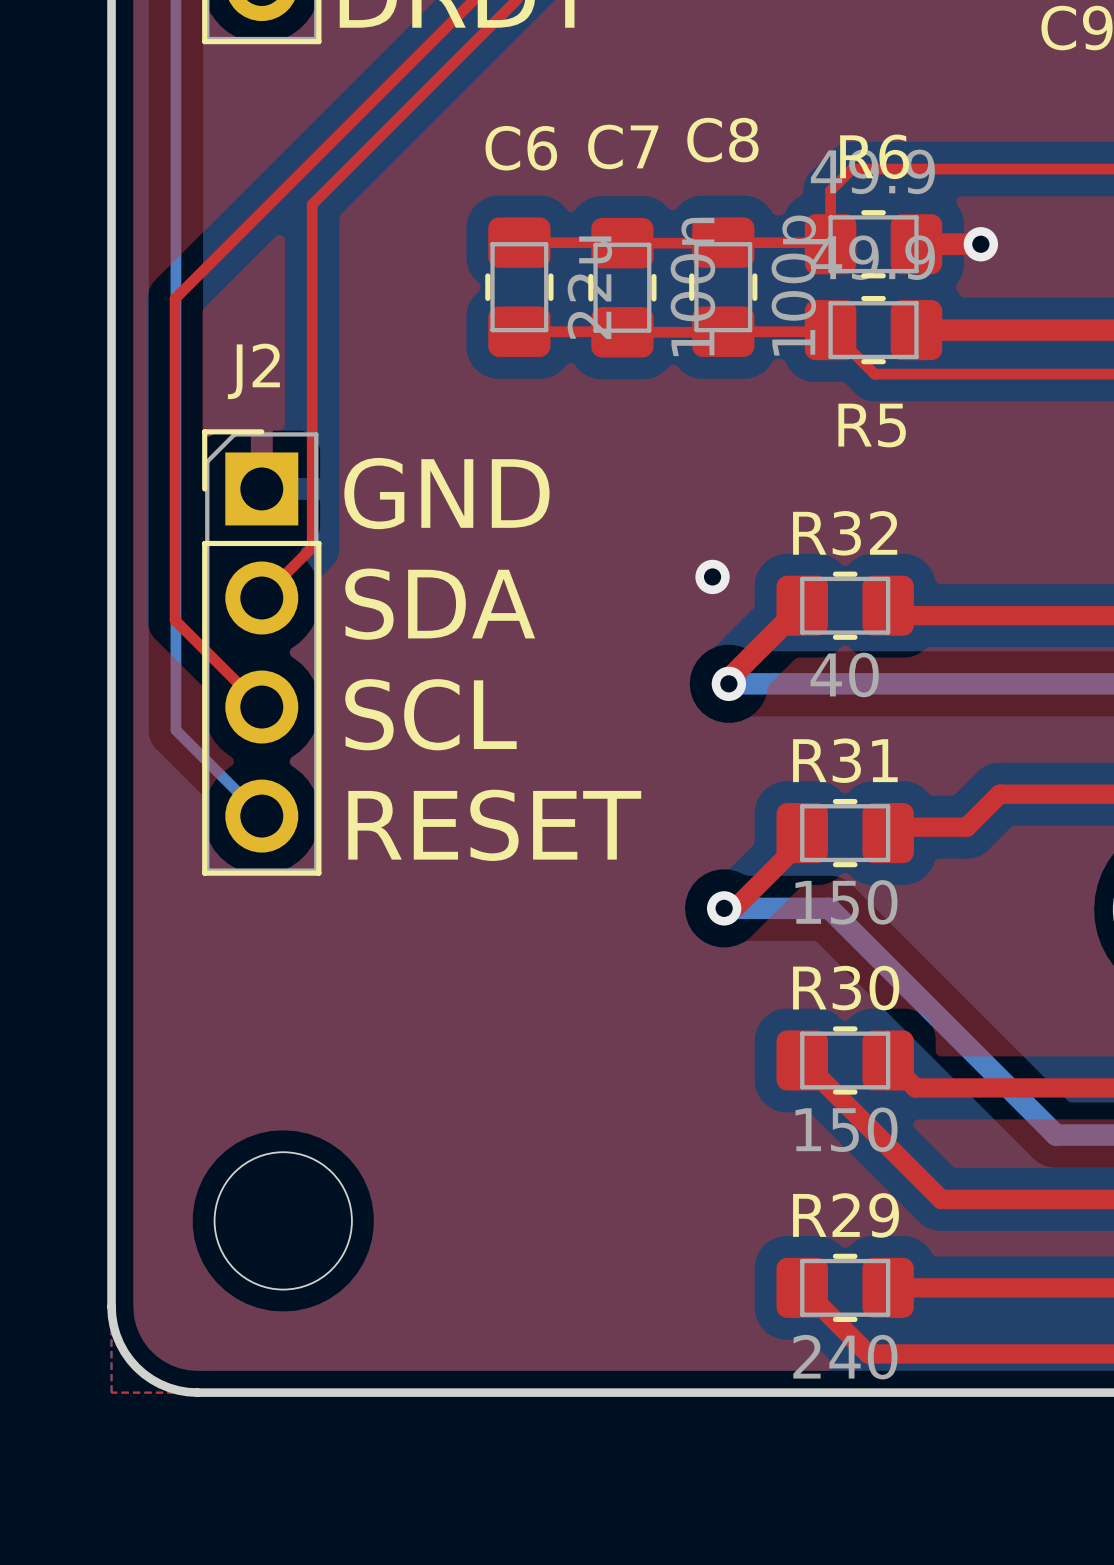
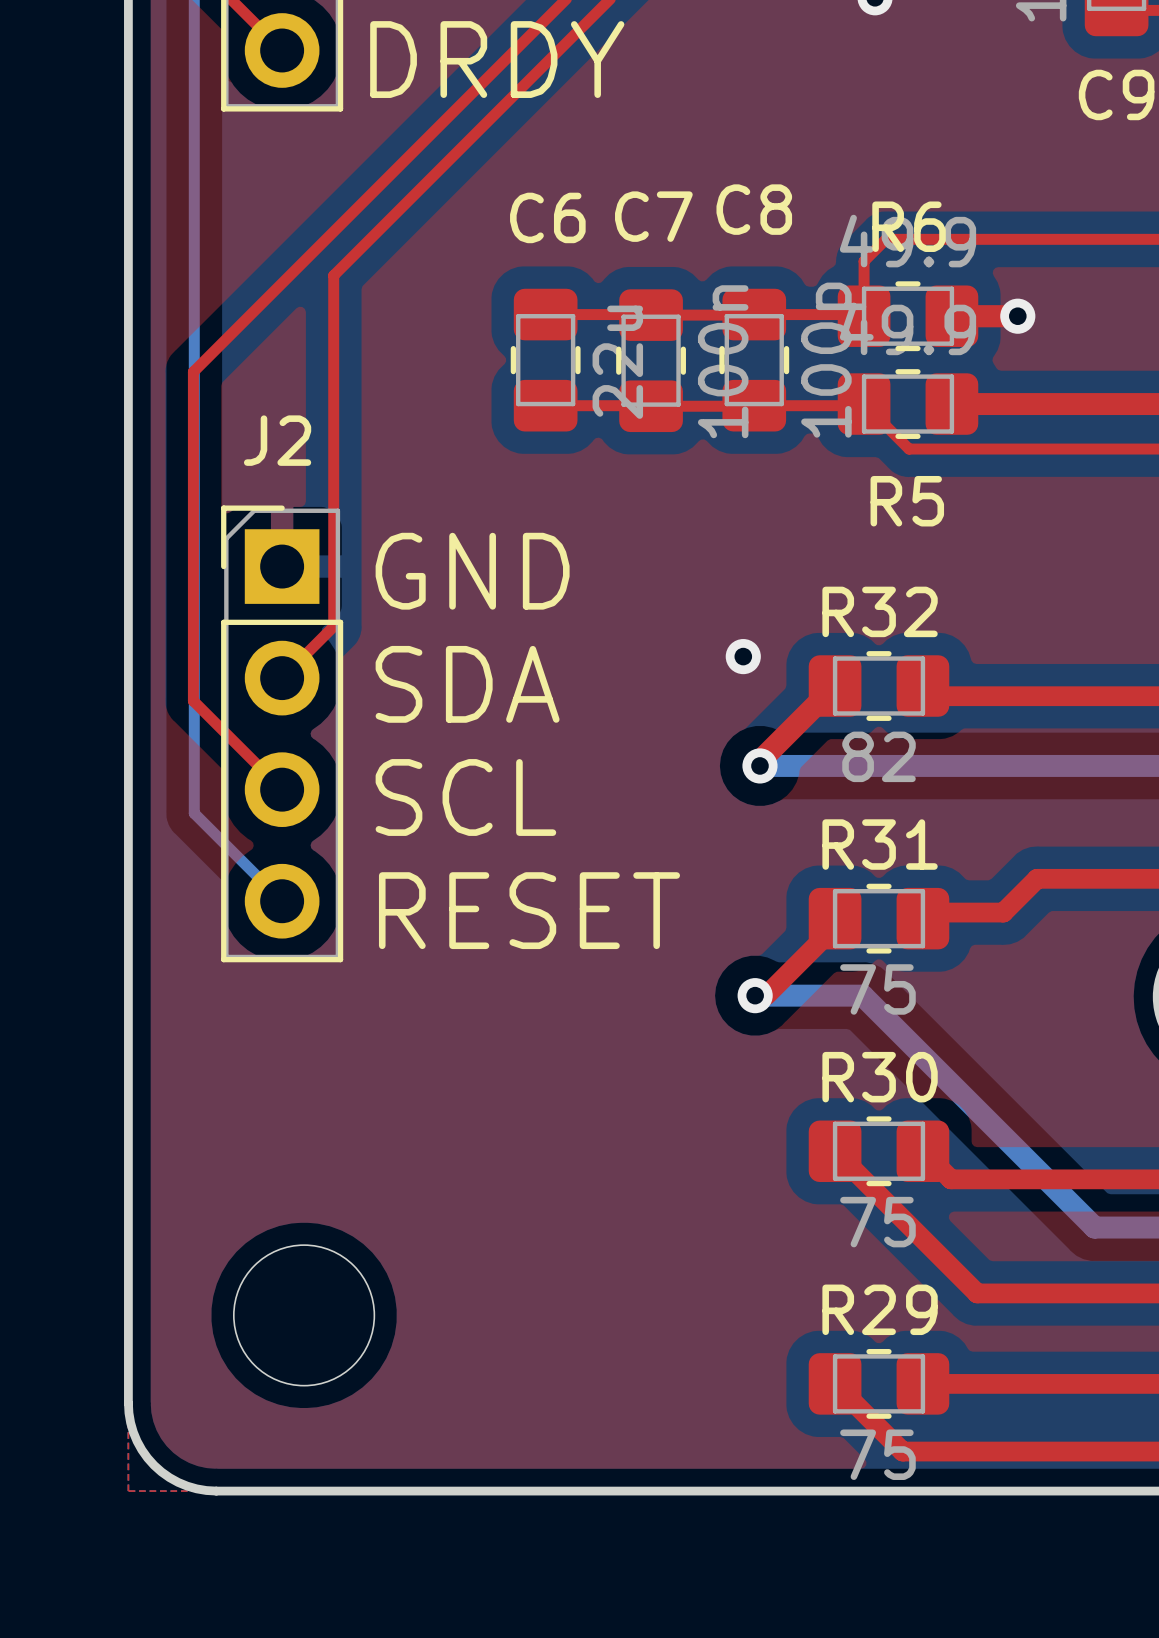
R32 value: 40 (844, 674) -> 82 (879, 756)
R31 value: 150 (846, 902) -> 75 (877, 989)
R30 value: 150 (846, 1129) -> 75 (877, 1222)
R29 value: 240 (845, 1357) -> 75 (877, 1454)

